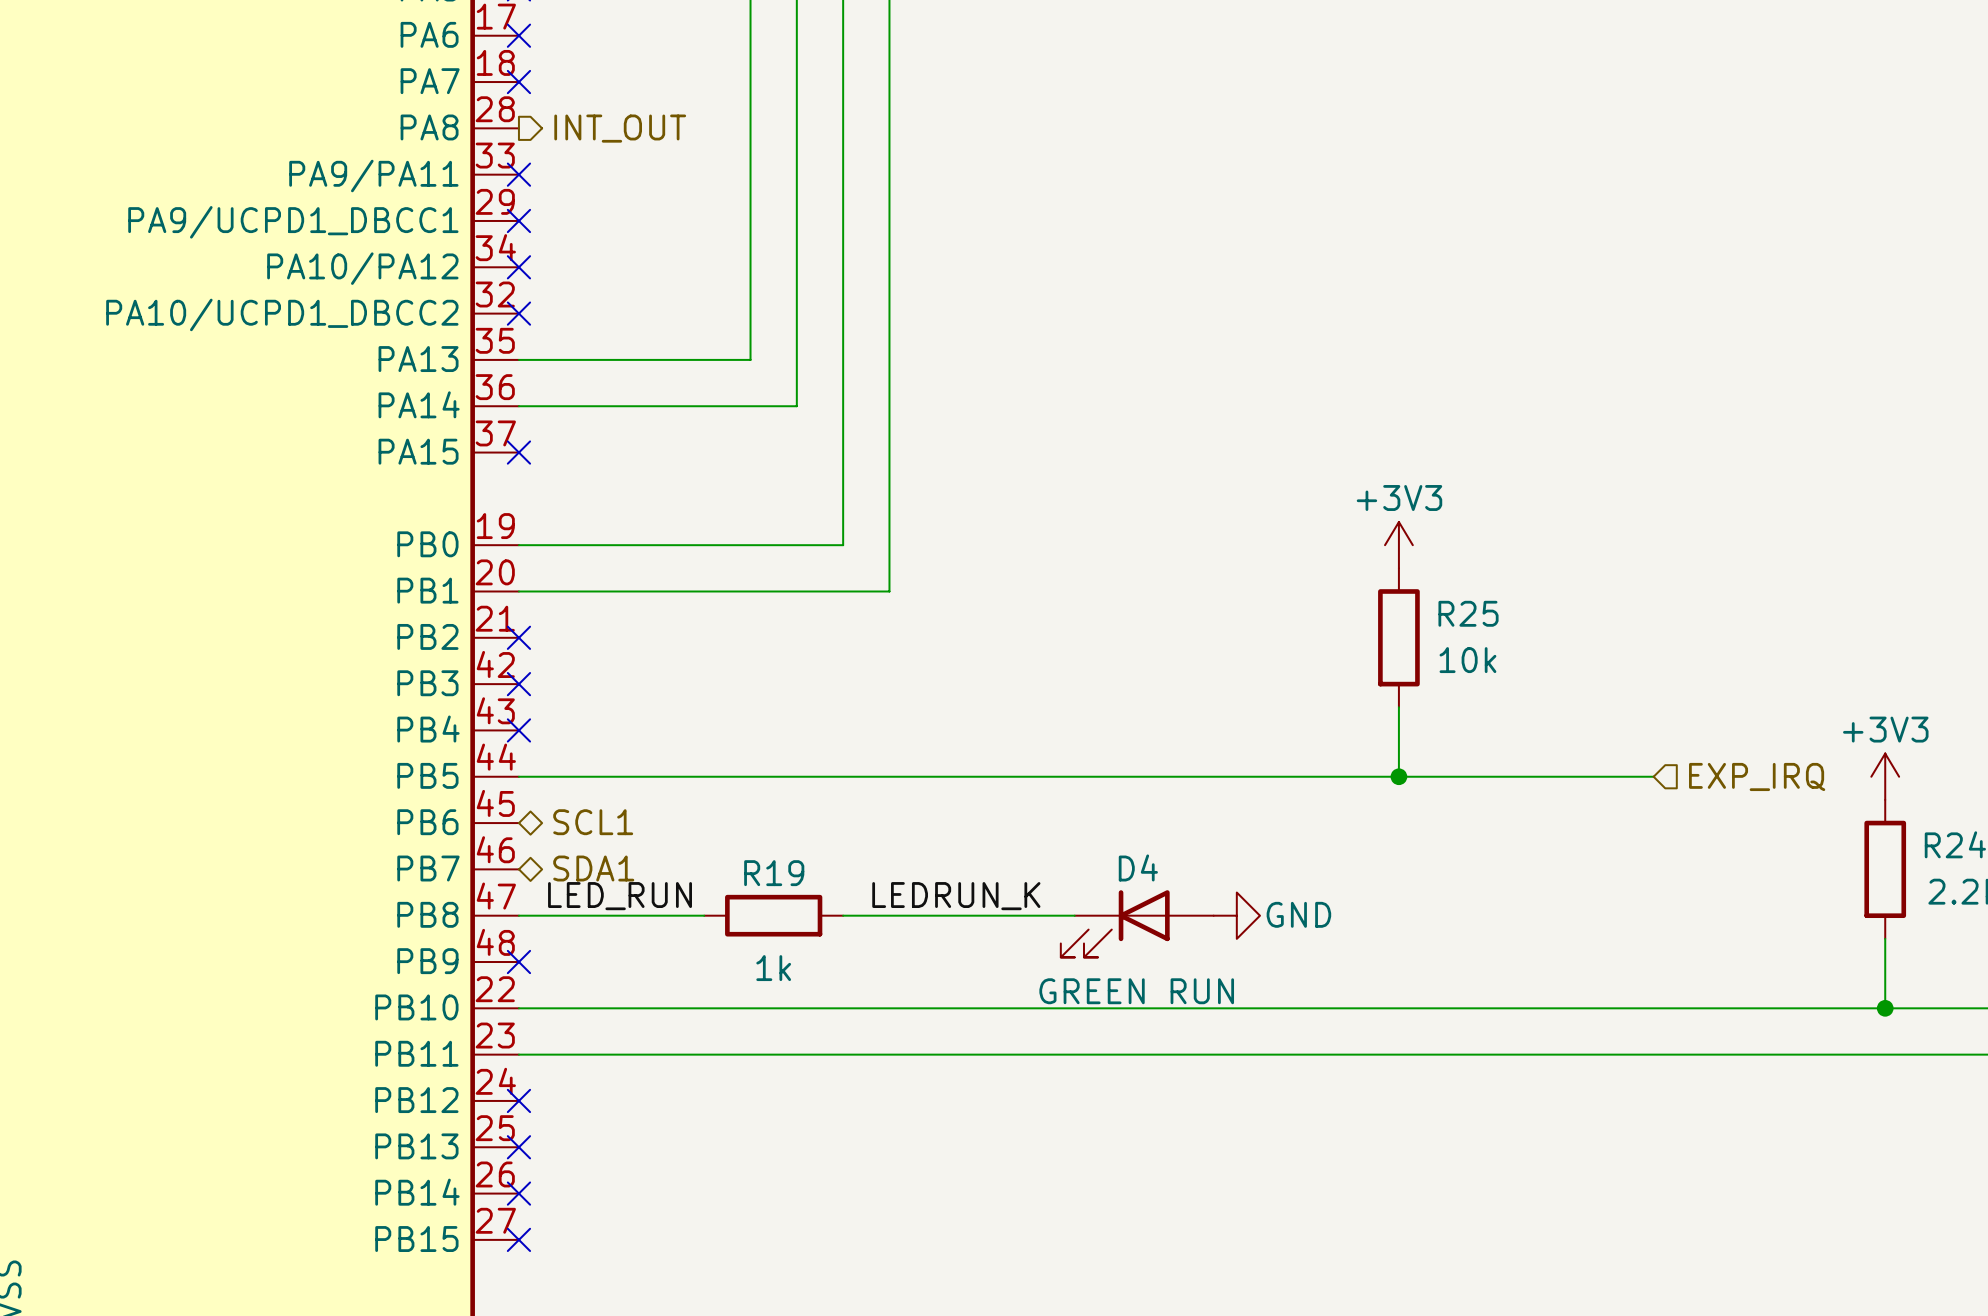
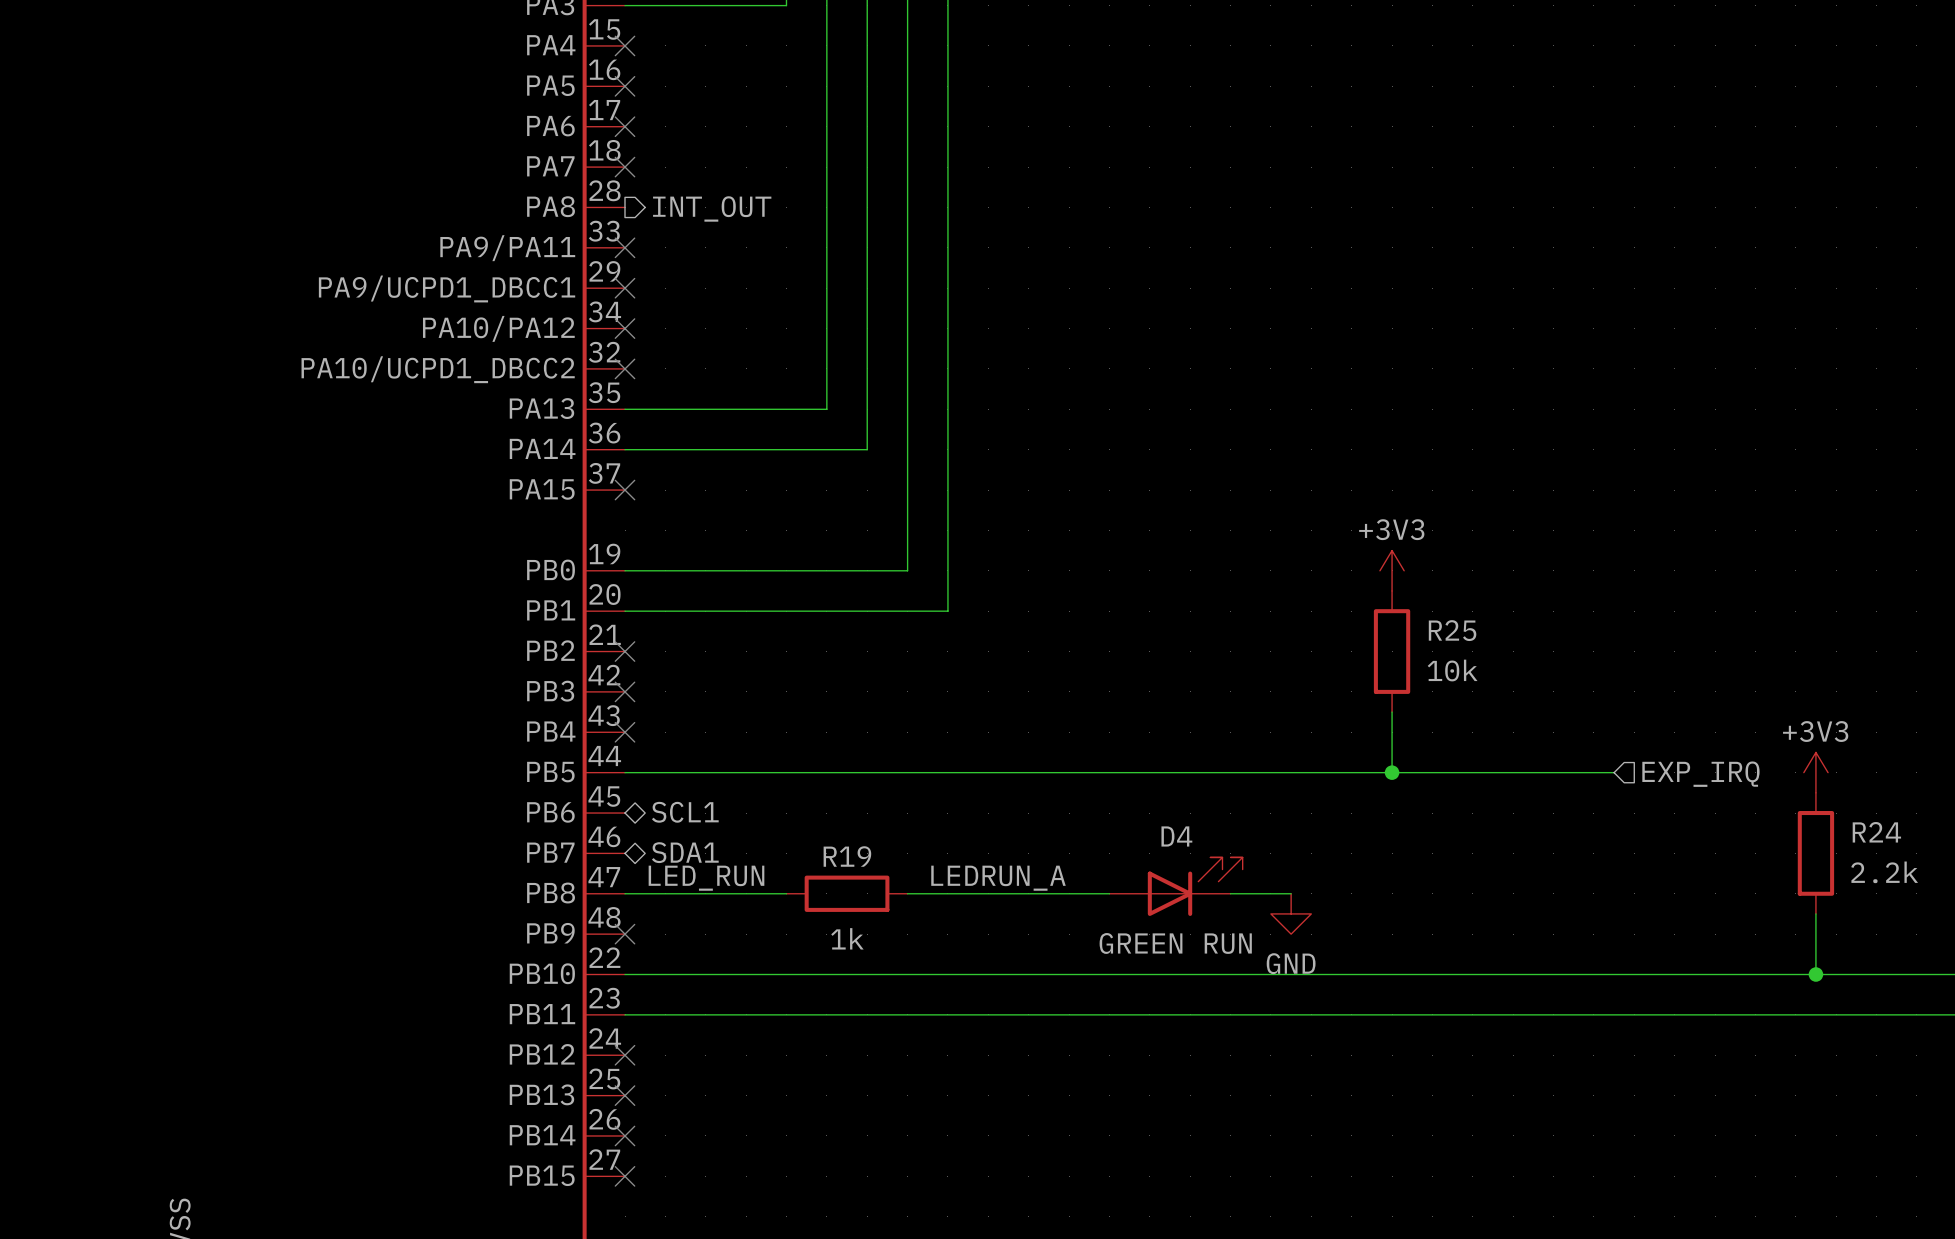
label: LEDRUN_K (956, 896) -> LEDRUN_A (998, 878)
wire: none -> (1230, 893) (1291, 893)
power symbol rotation: 0° (1236, 915) -> 90° clockwise (1291, 913)
power symbol position: GND (1236, 915) -> GND (1291, 913)
D4 rotation: 0° (1115, 923) -> 180° (1195, 886)

